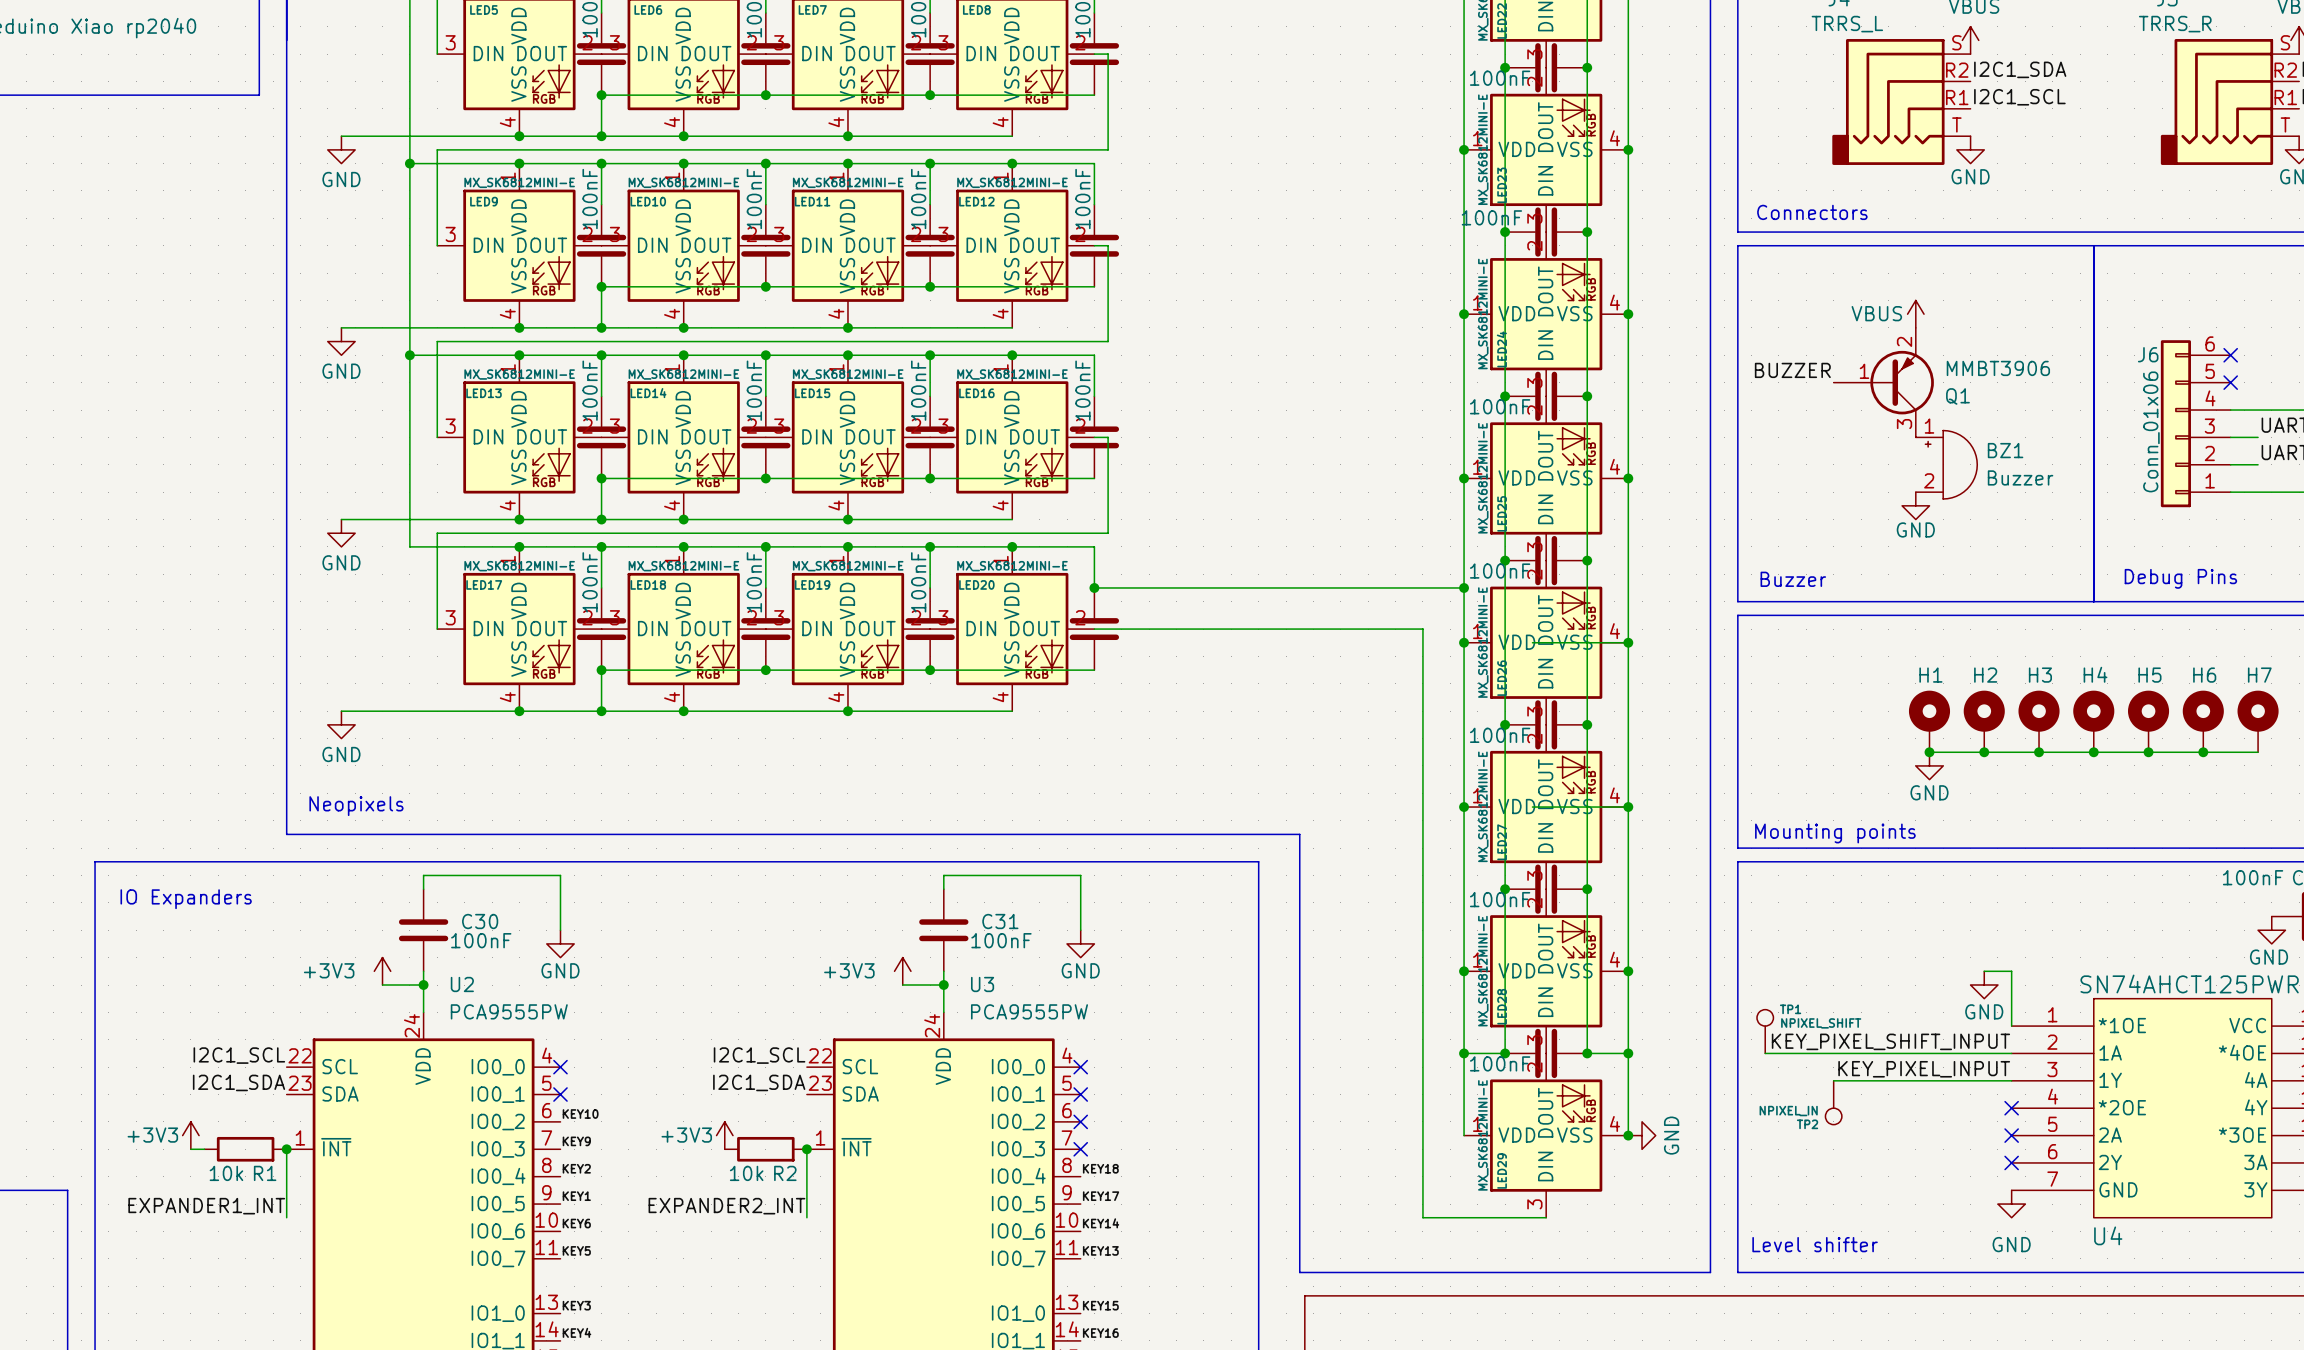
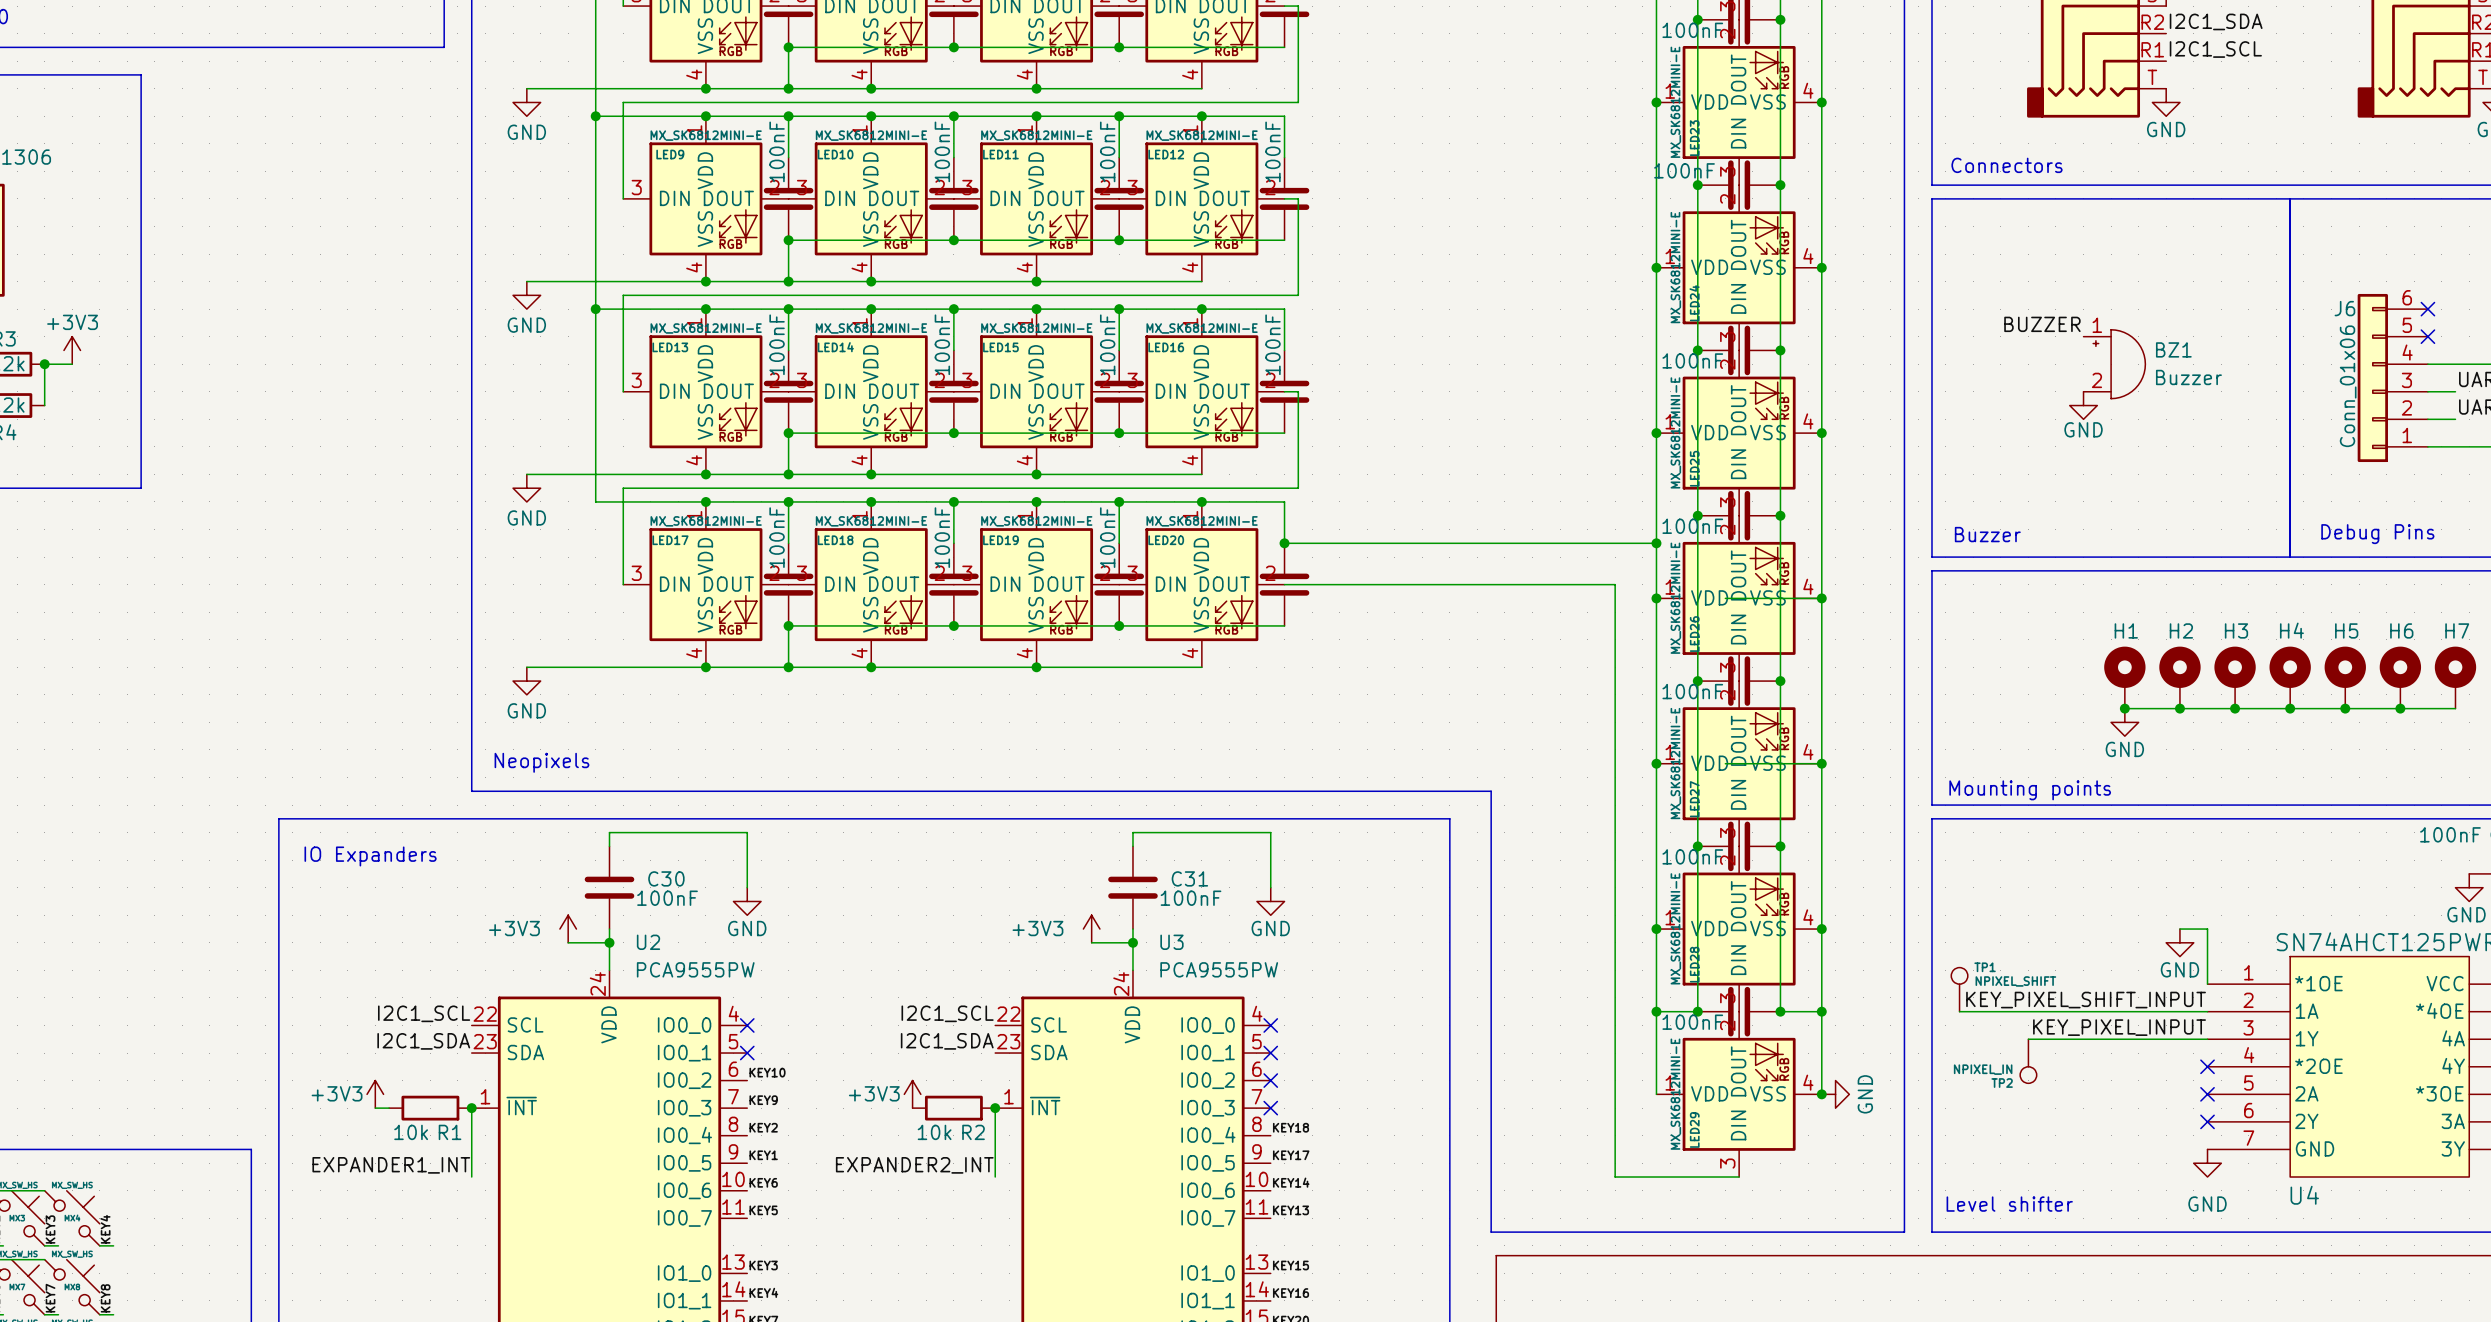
power symbol: VBUS (1915, 314) -> none
label position: BUZZER (1792, 370) -> BUZZER (2042, 324)
Q1: MMBT3906 (1883, 382) -> none
BZ1 position: (1946, 464) -> (2114, 364)
power symbol position: GND (1915, 505) -> GND (2083, 405)

